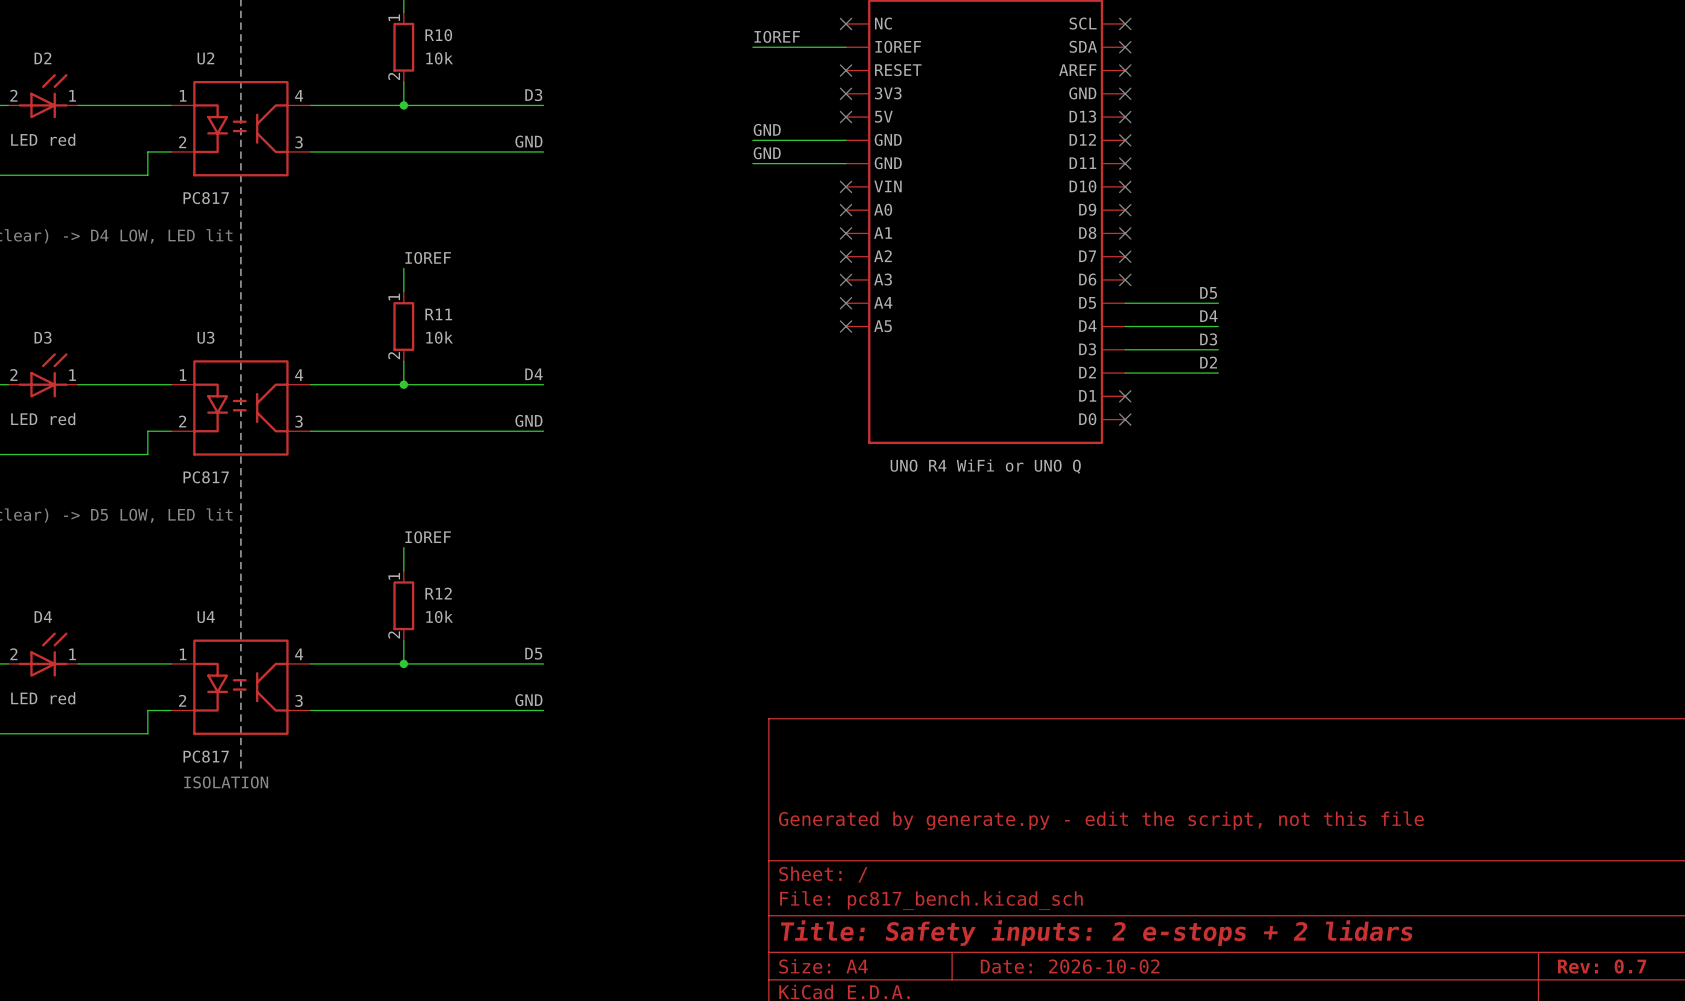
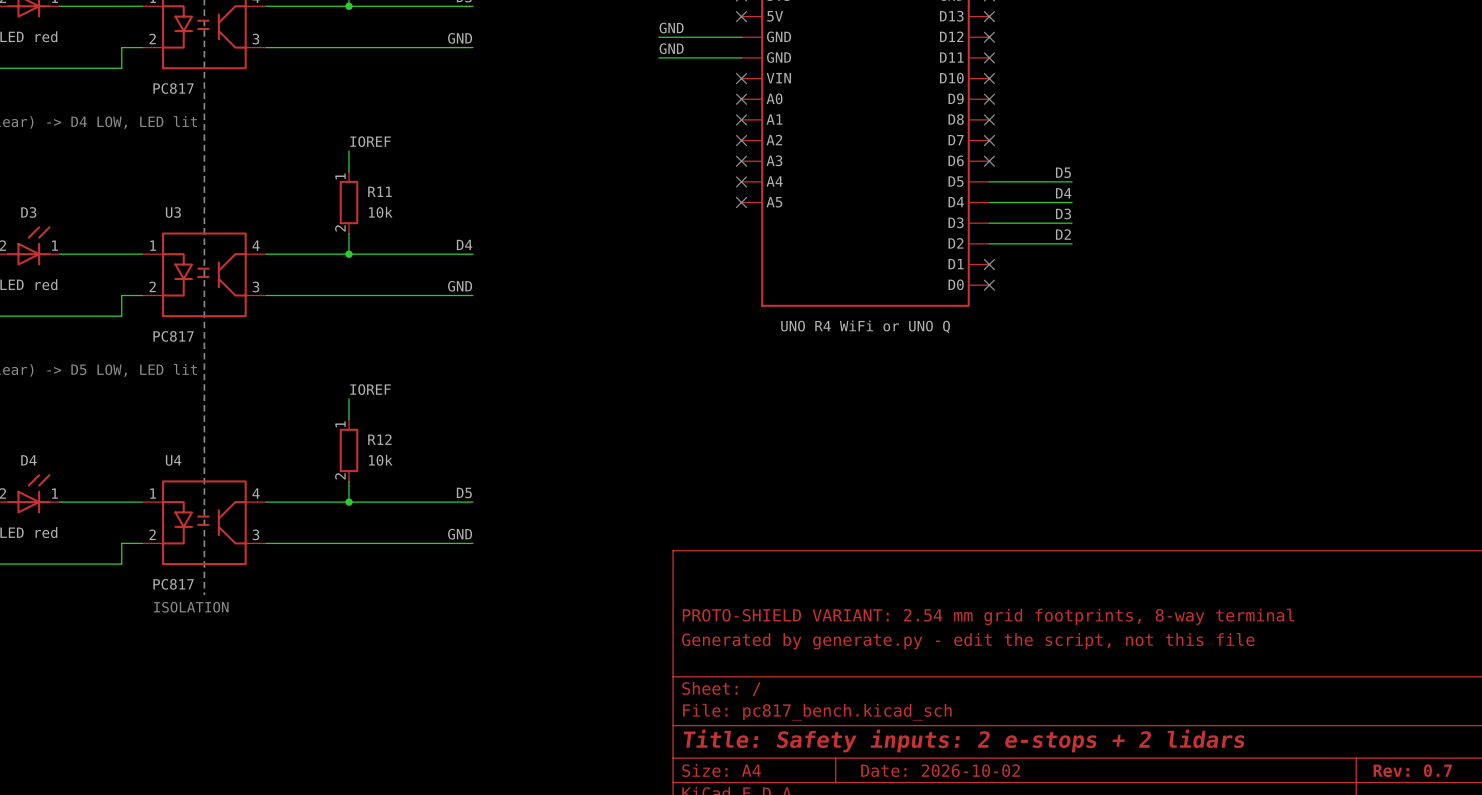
title block: none -> PROTO-SHIELD VARIANT: 2.54 mm grid footprints, 8-way terminal (988, 616)

